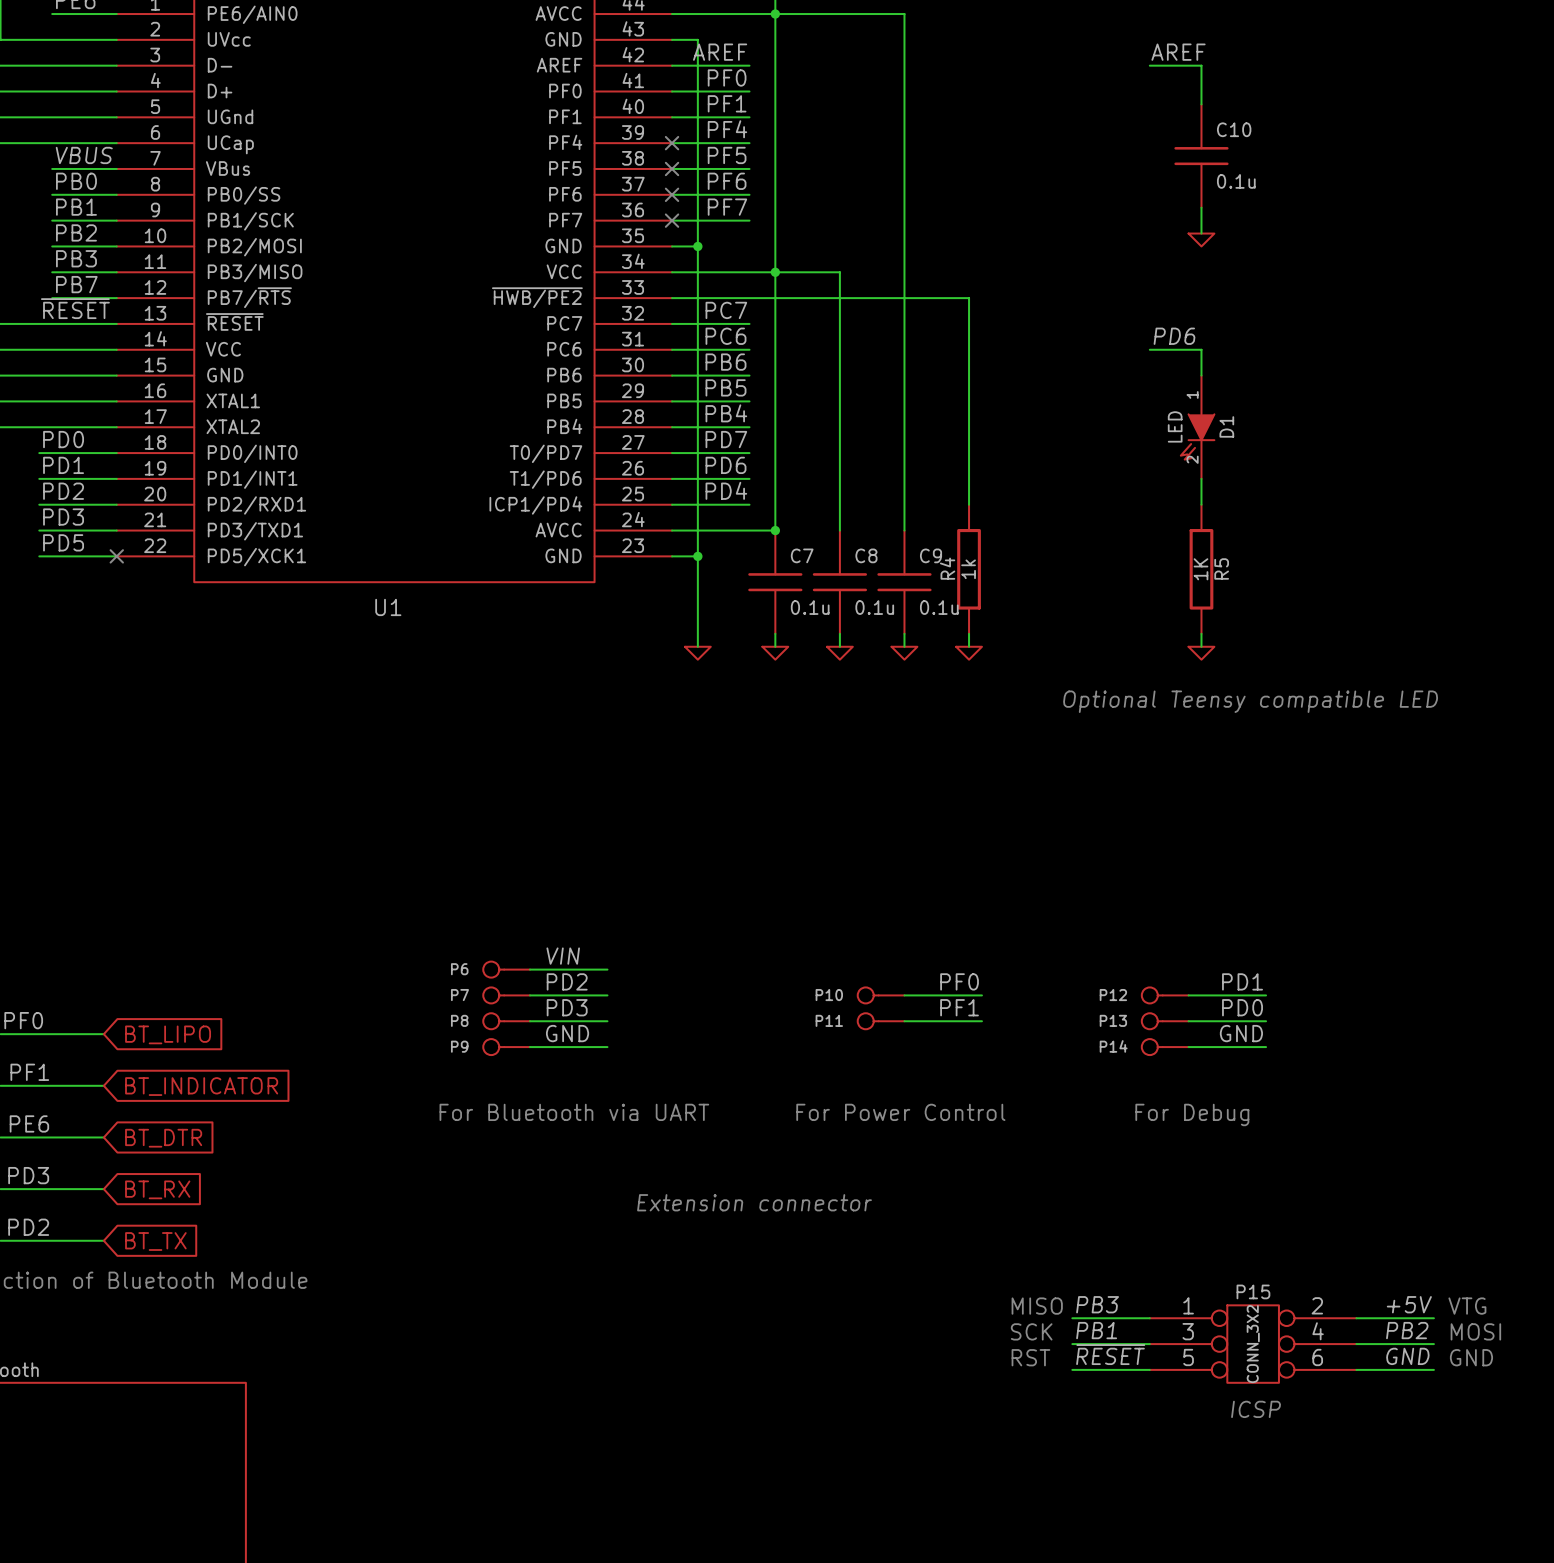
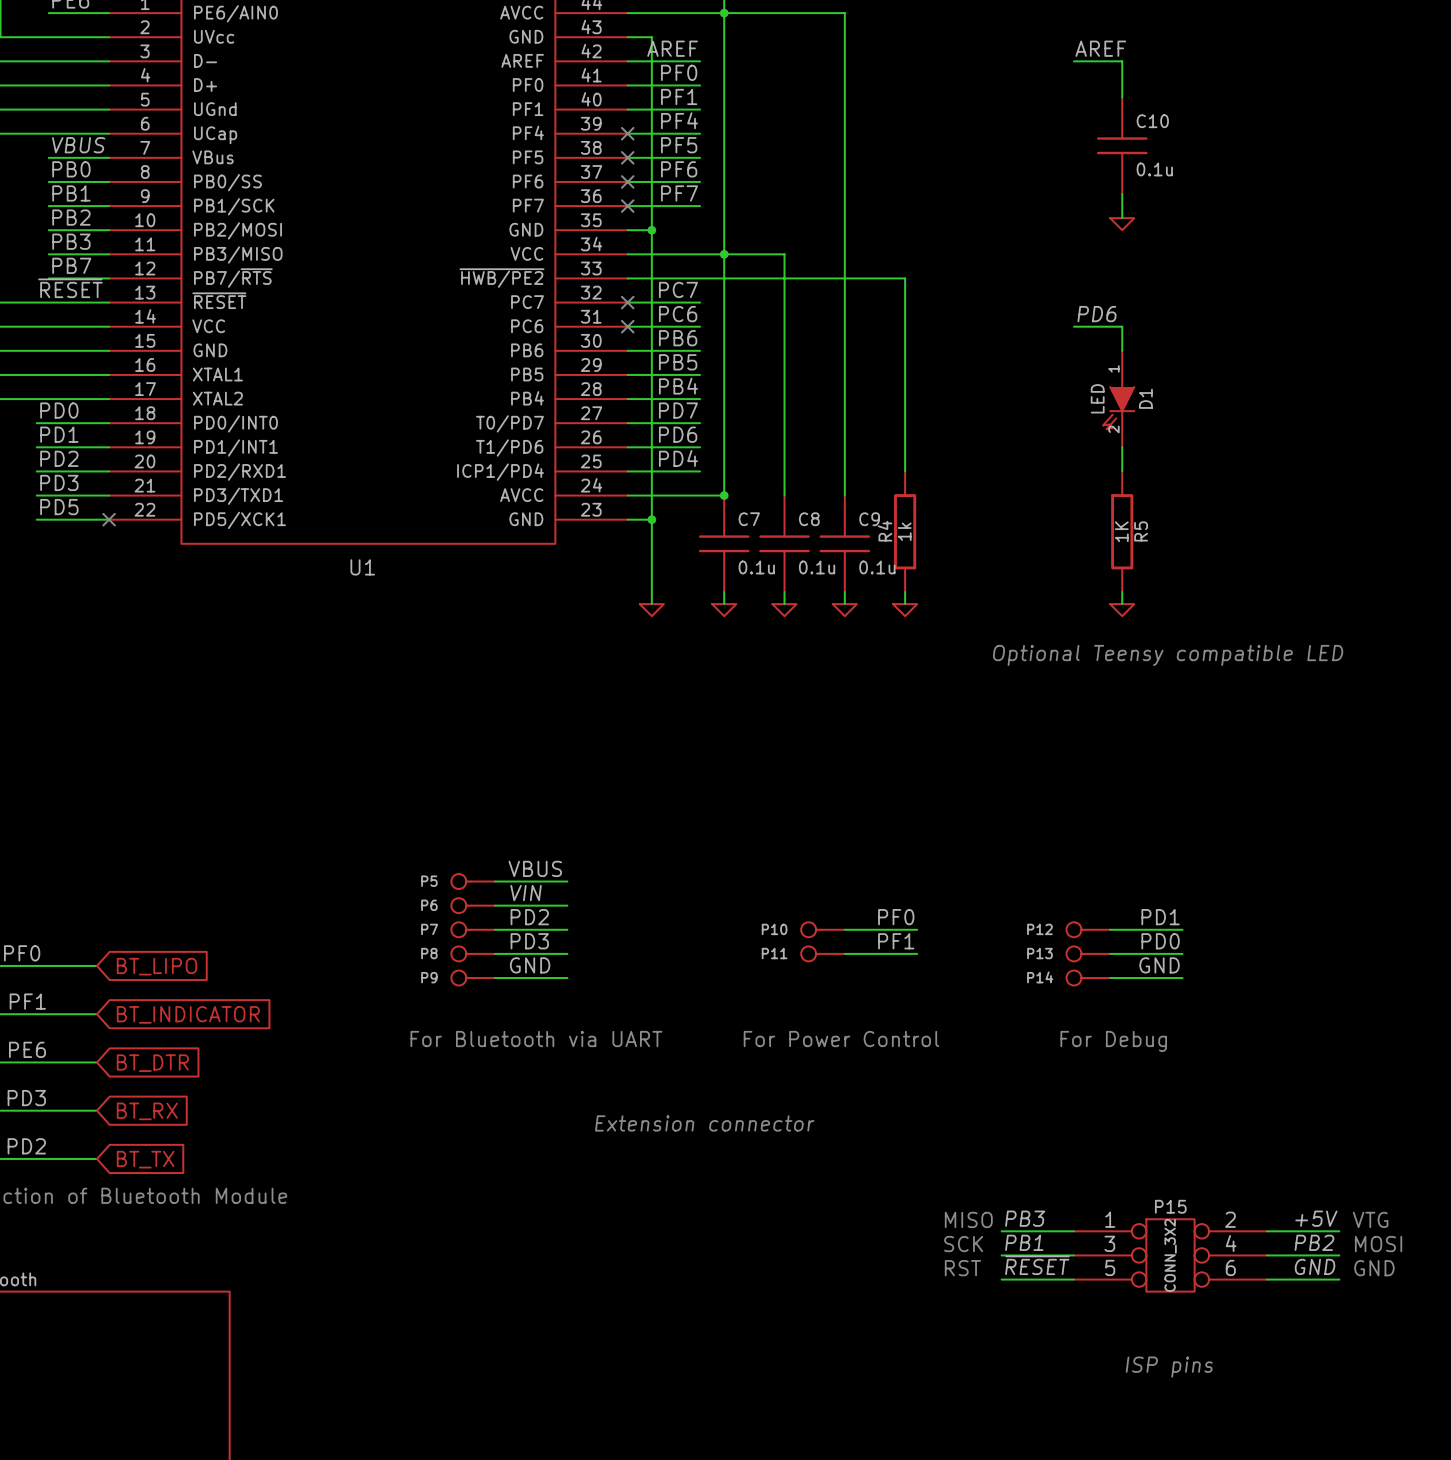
no-connect mark: none -> (627, 302)
no-connect mark: none -> (627, 326)
label: none -> VBUS (535, 868)
P5: none -> (473, 881)
wire: none -> (495, 881) (567, 881)
text: ICSP (1256, 1409) -> none
text: none -> ISP pins (1169, 1367)

